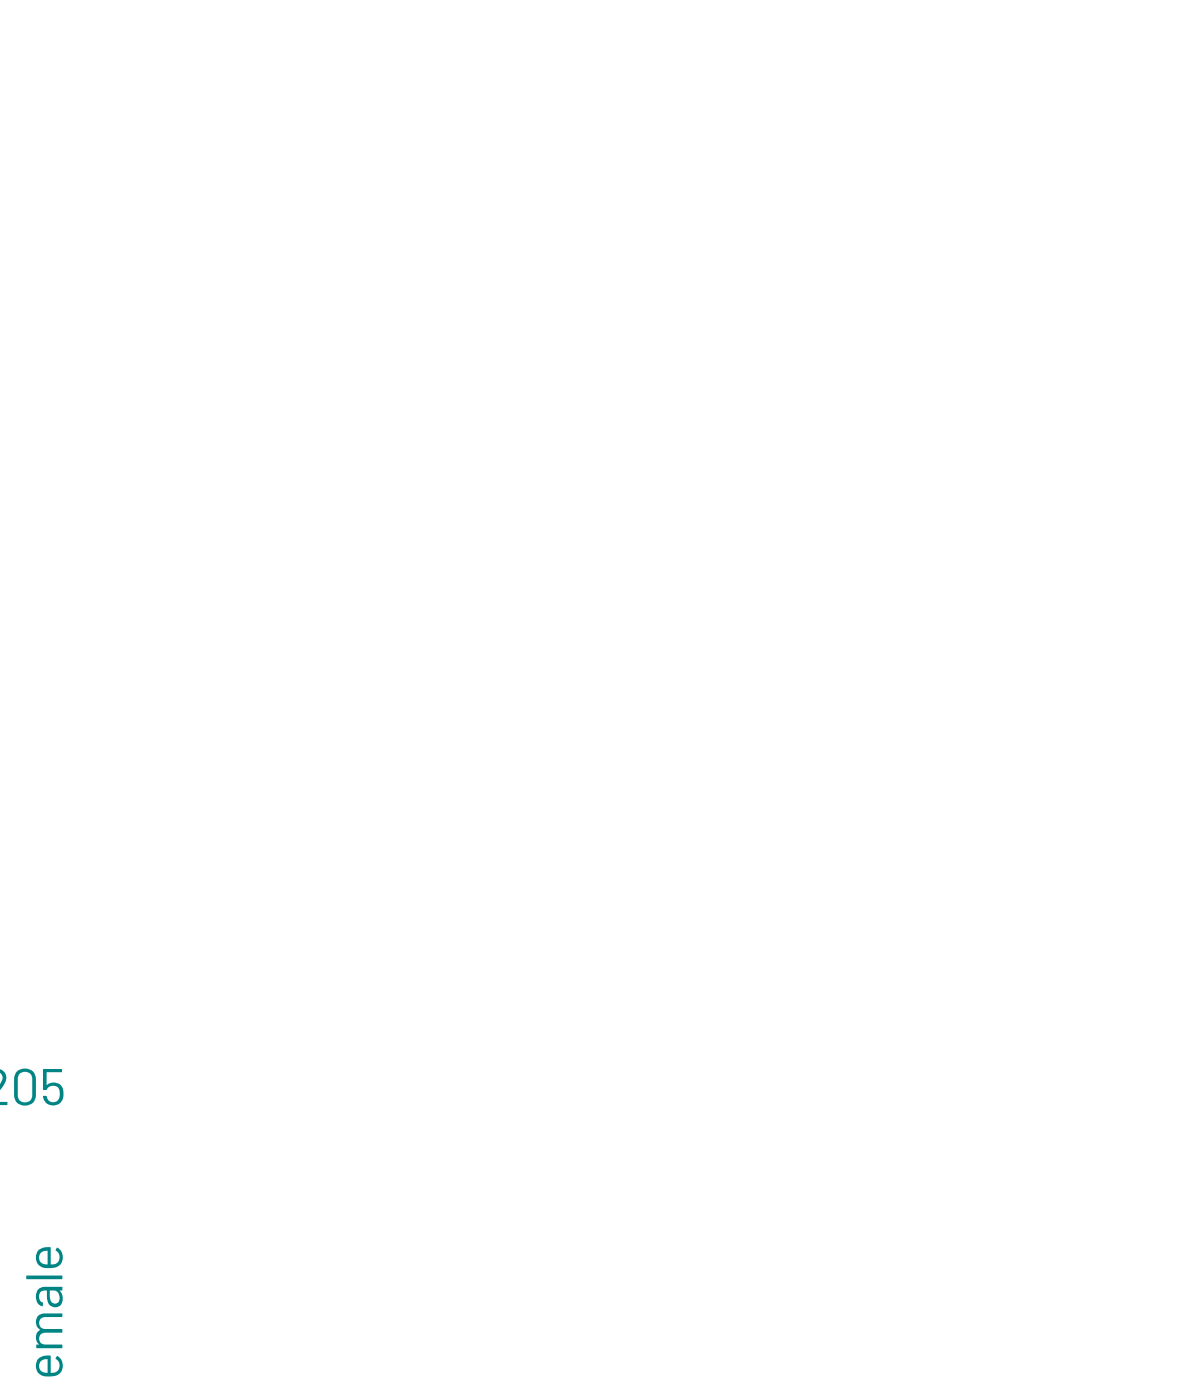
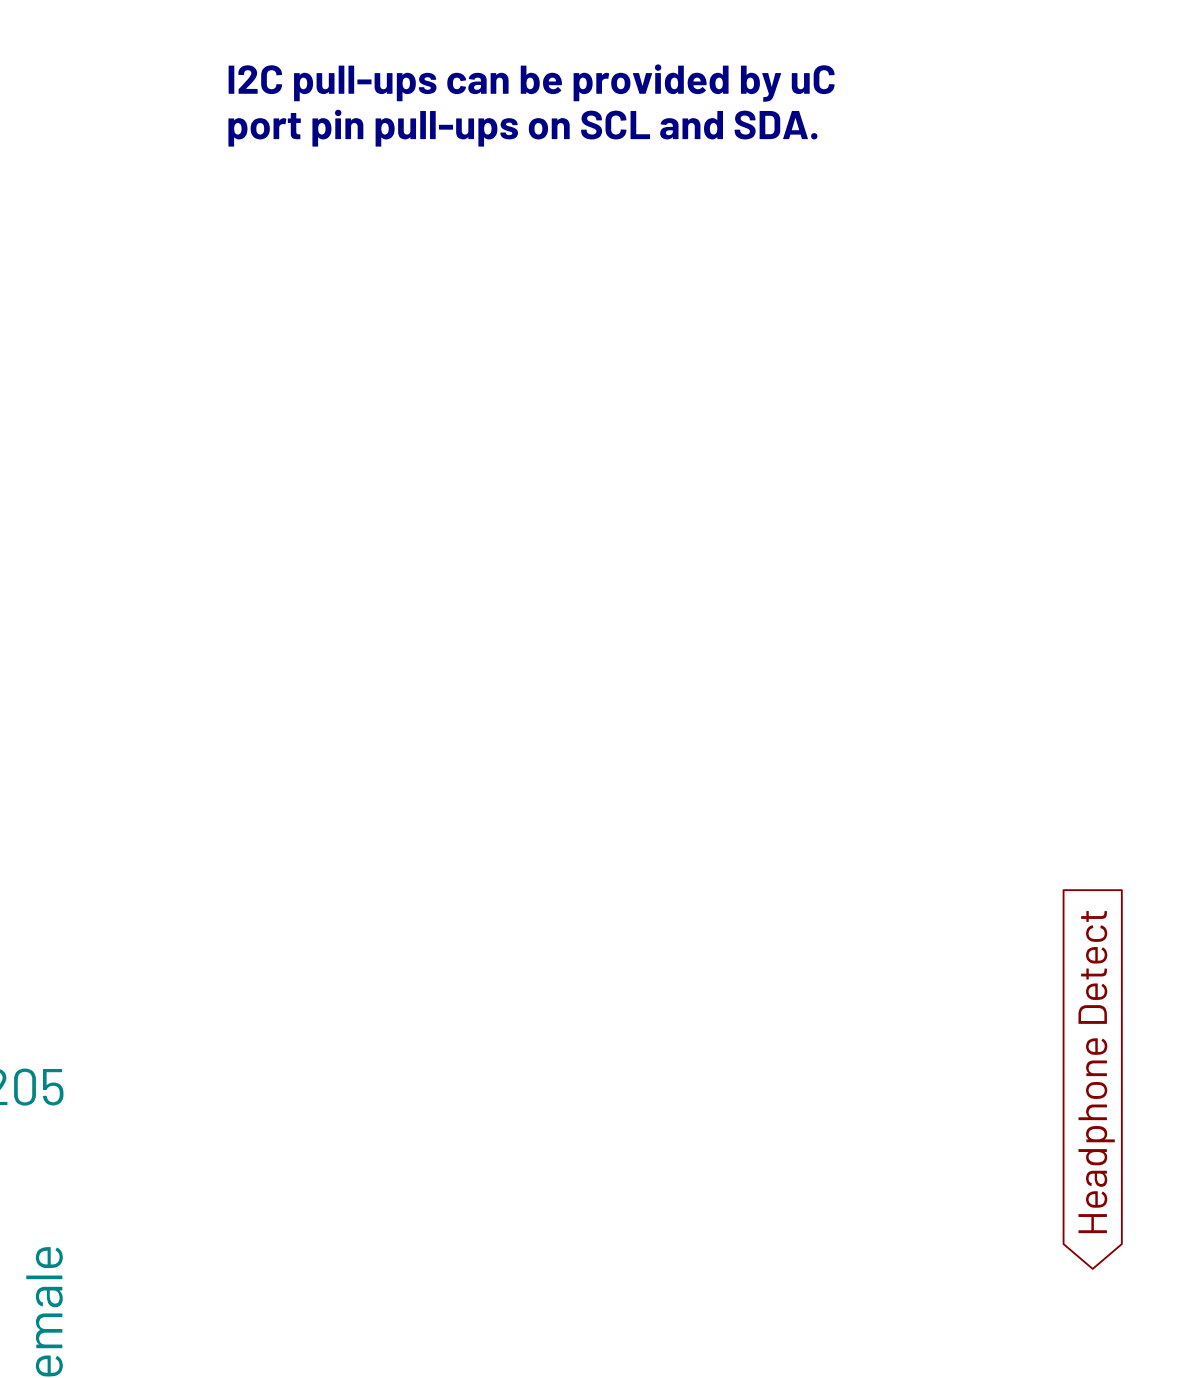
text: none -> I2C pull-ups can be provided by uC (531, 83)
text: none -> port pin pull-ups on SCL and SDA. (522, 128)
global label: none -> Headphone Detect (1096, 1072)

